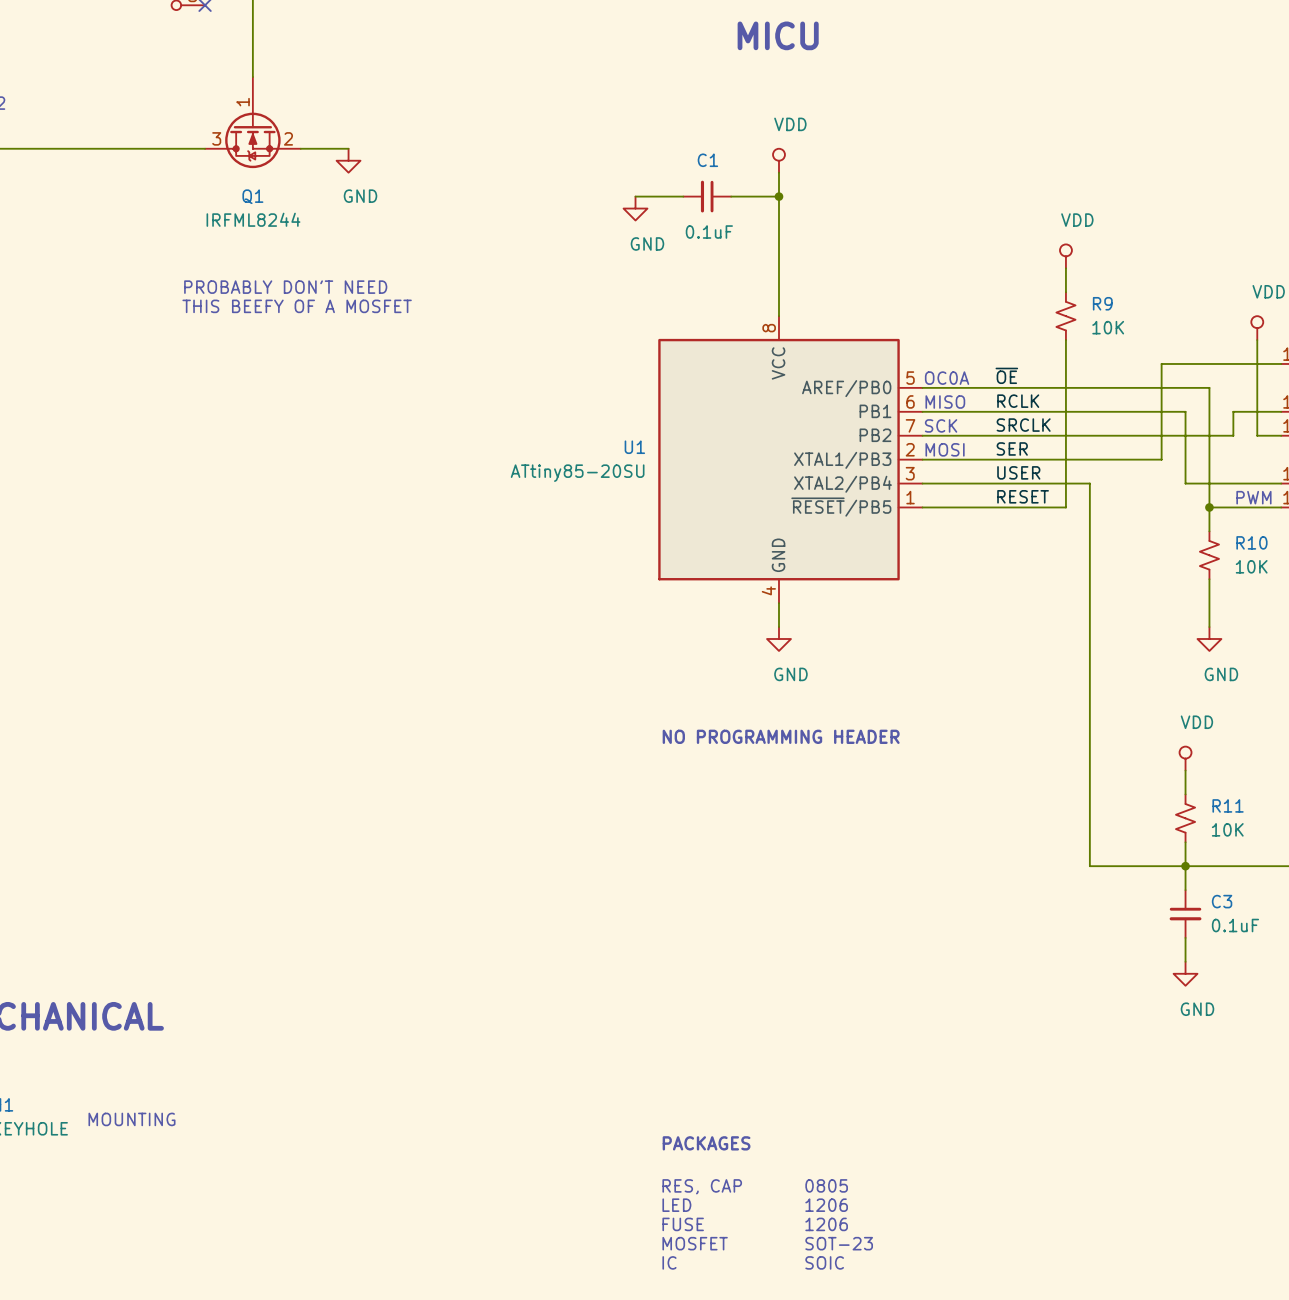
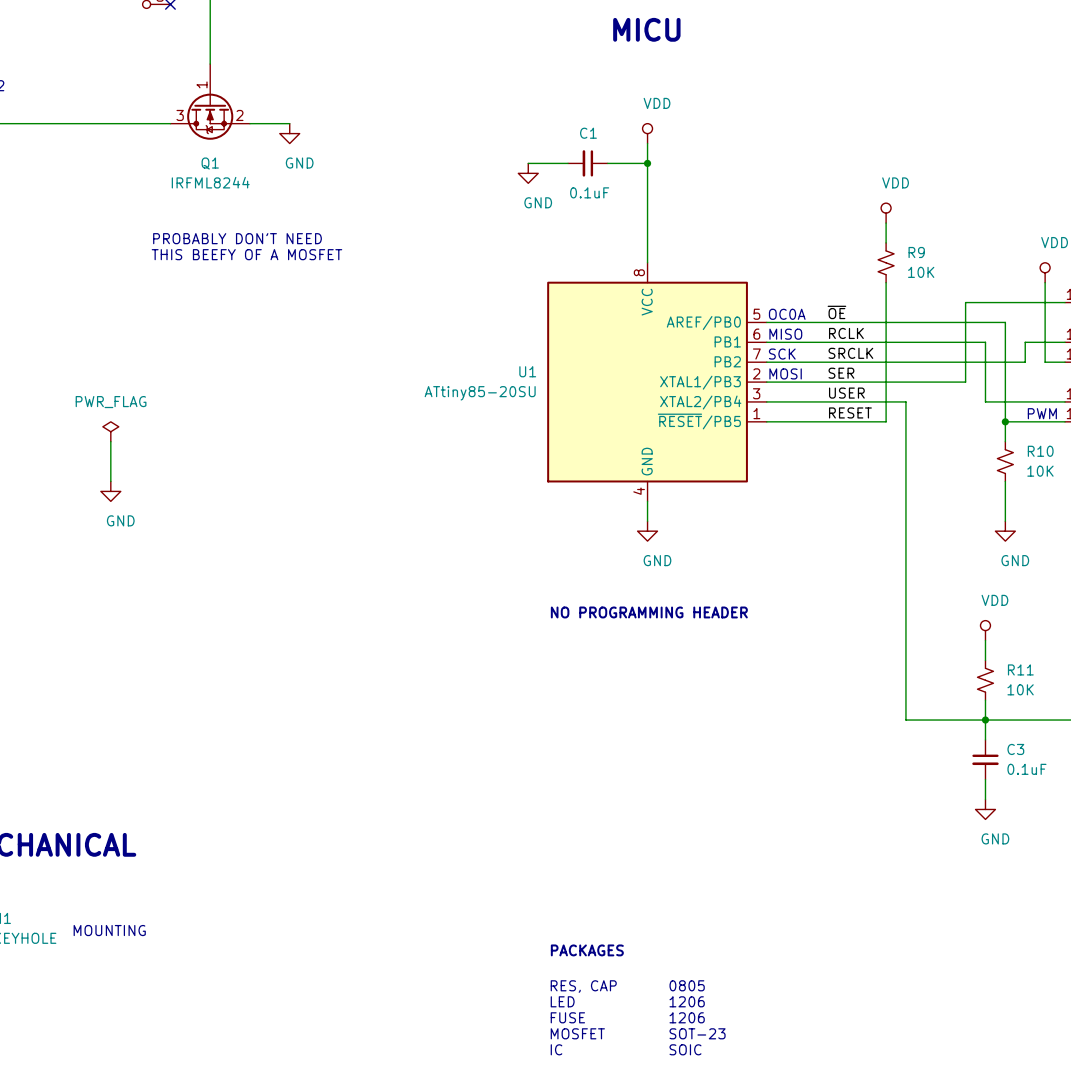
power symbol: none -> PWR_FLAG (110, 431)
wire: none -> (110, 441) (110, 481)
power symbol: none -> GND (110, 491)

